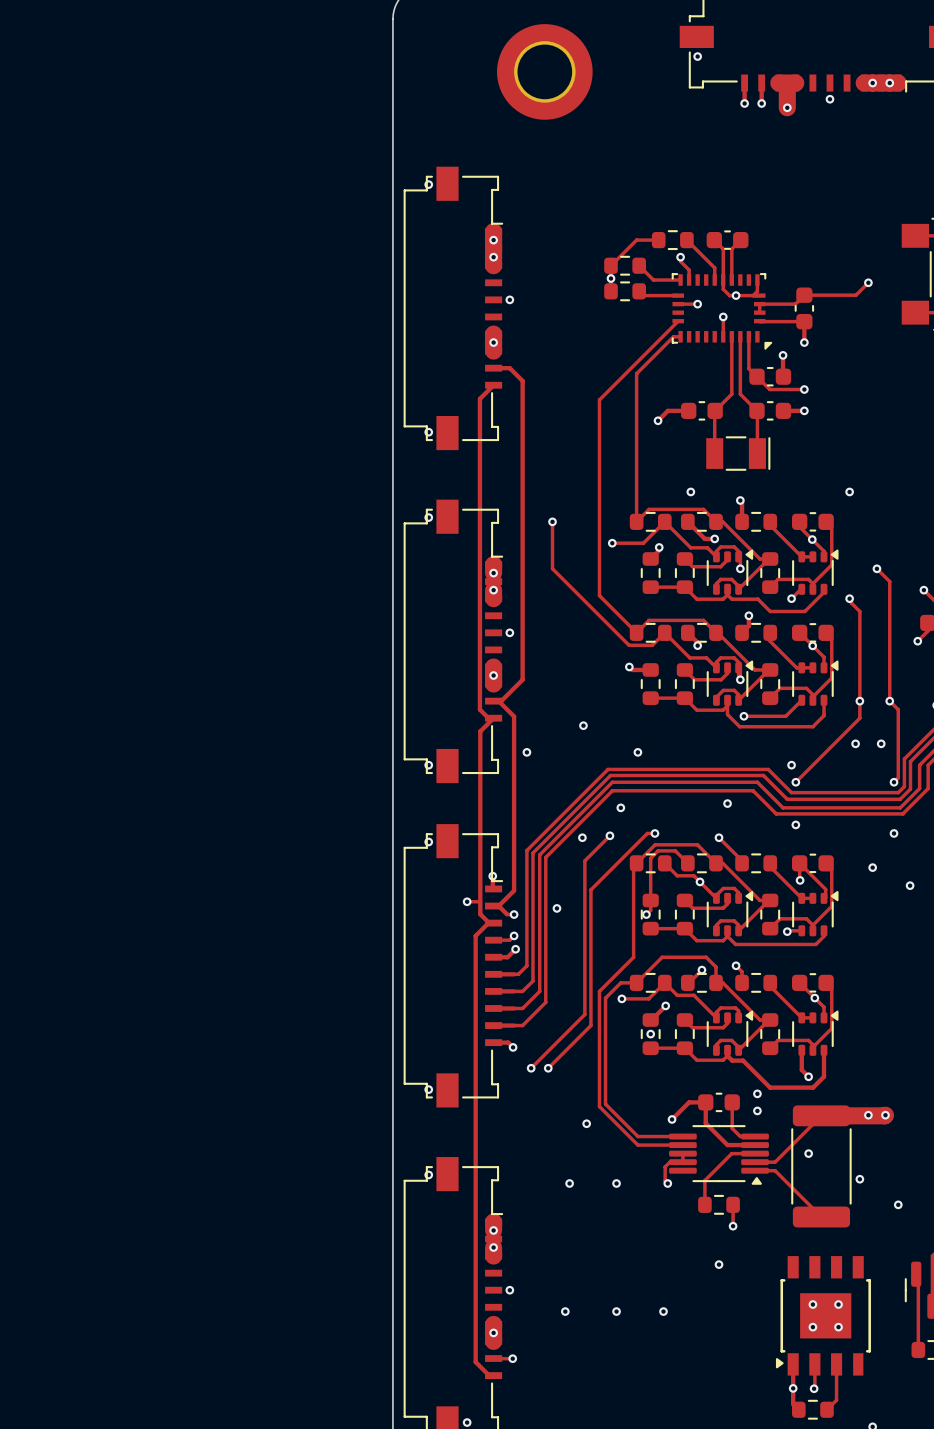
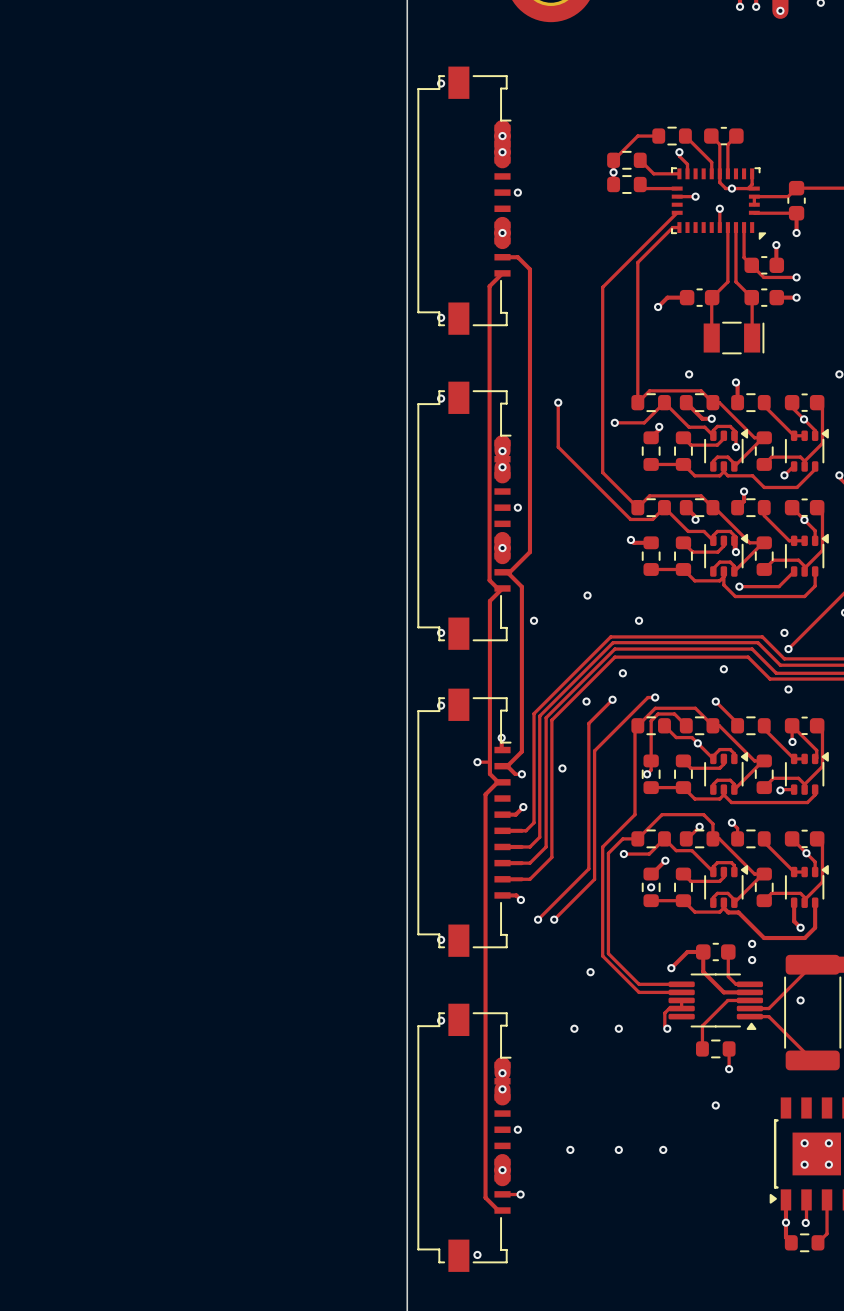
track: (514, 935) (509, 940) (493, 940) -> none
via: (514, 935) -> none

